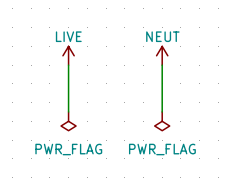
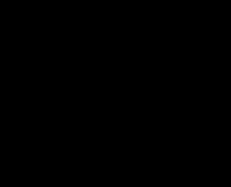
power symbol: LIVE (68, 55) -> none
power symbol: NEUT (162, 55) -> none
wire: (68, 65) (68, 111) -> none
wire: (162, 65) (162, 111) -> none
power symbol: PWR_FLAG (68, 121) -> none
power symbol: PWR_FLAG (162, 121) -> none

